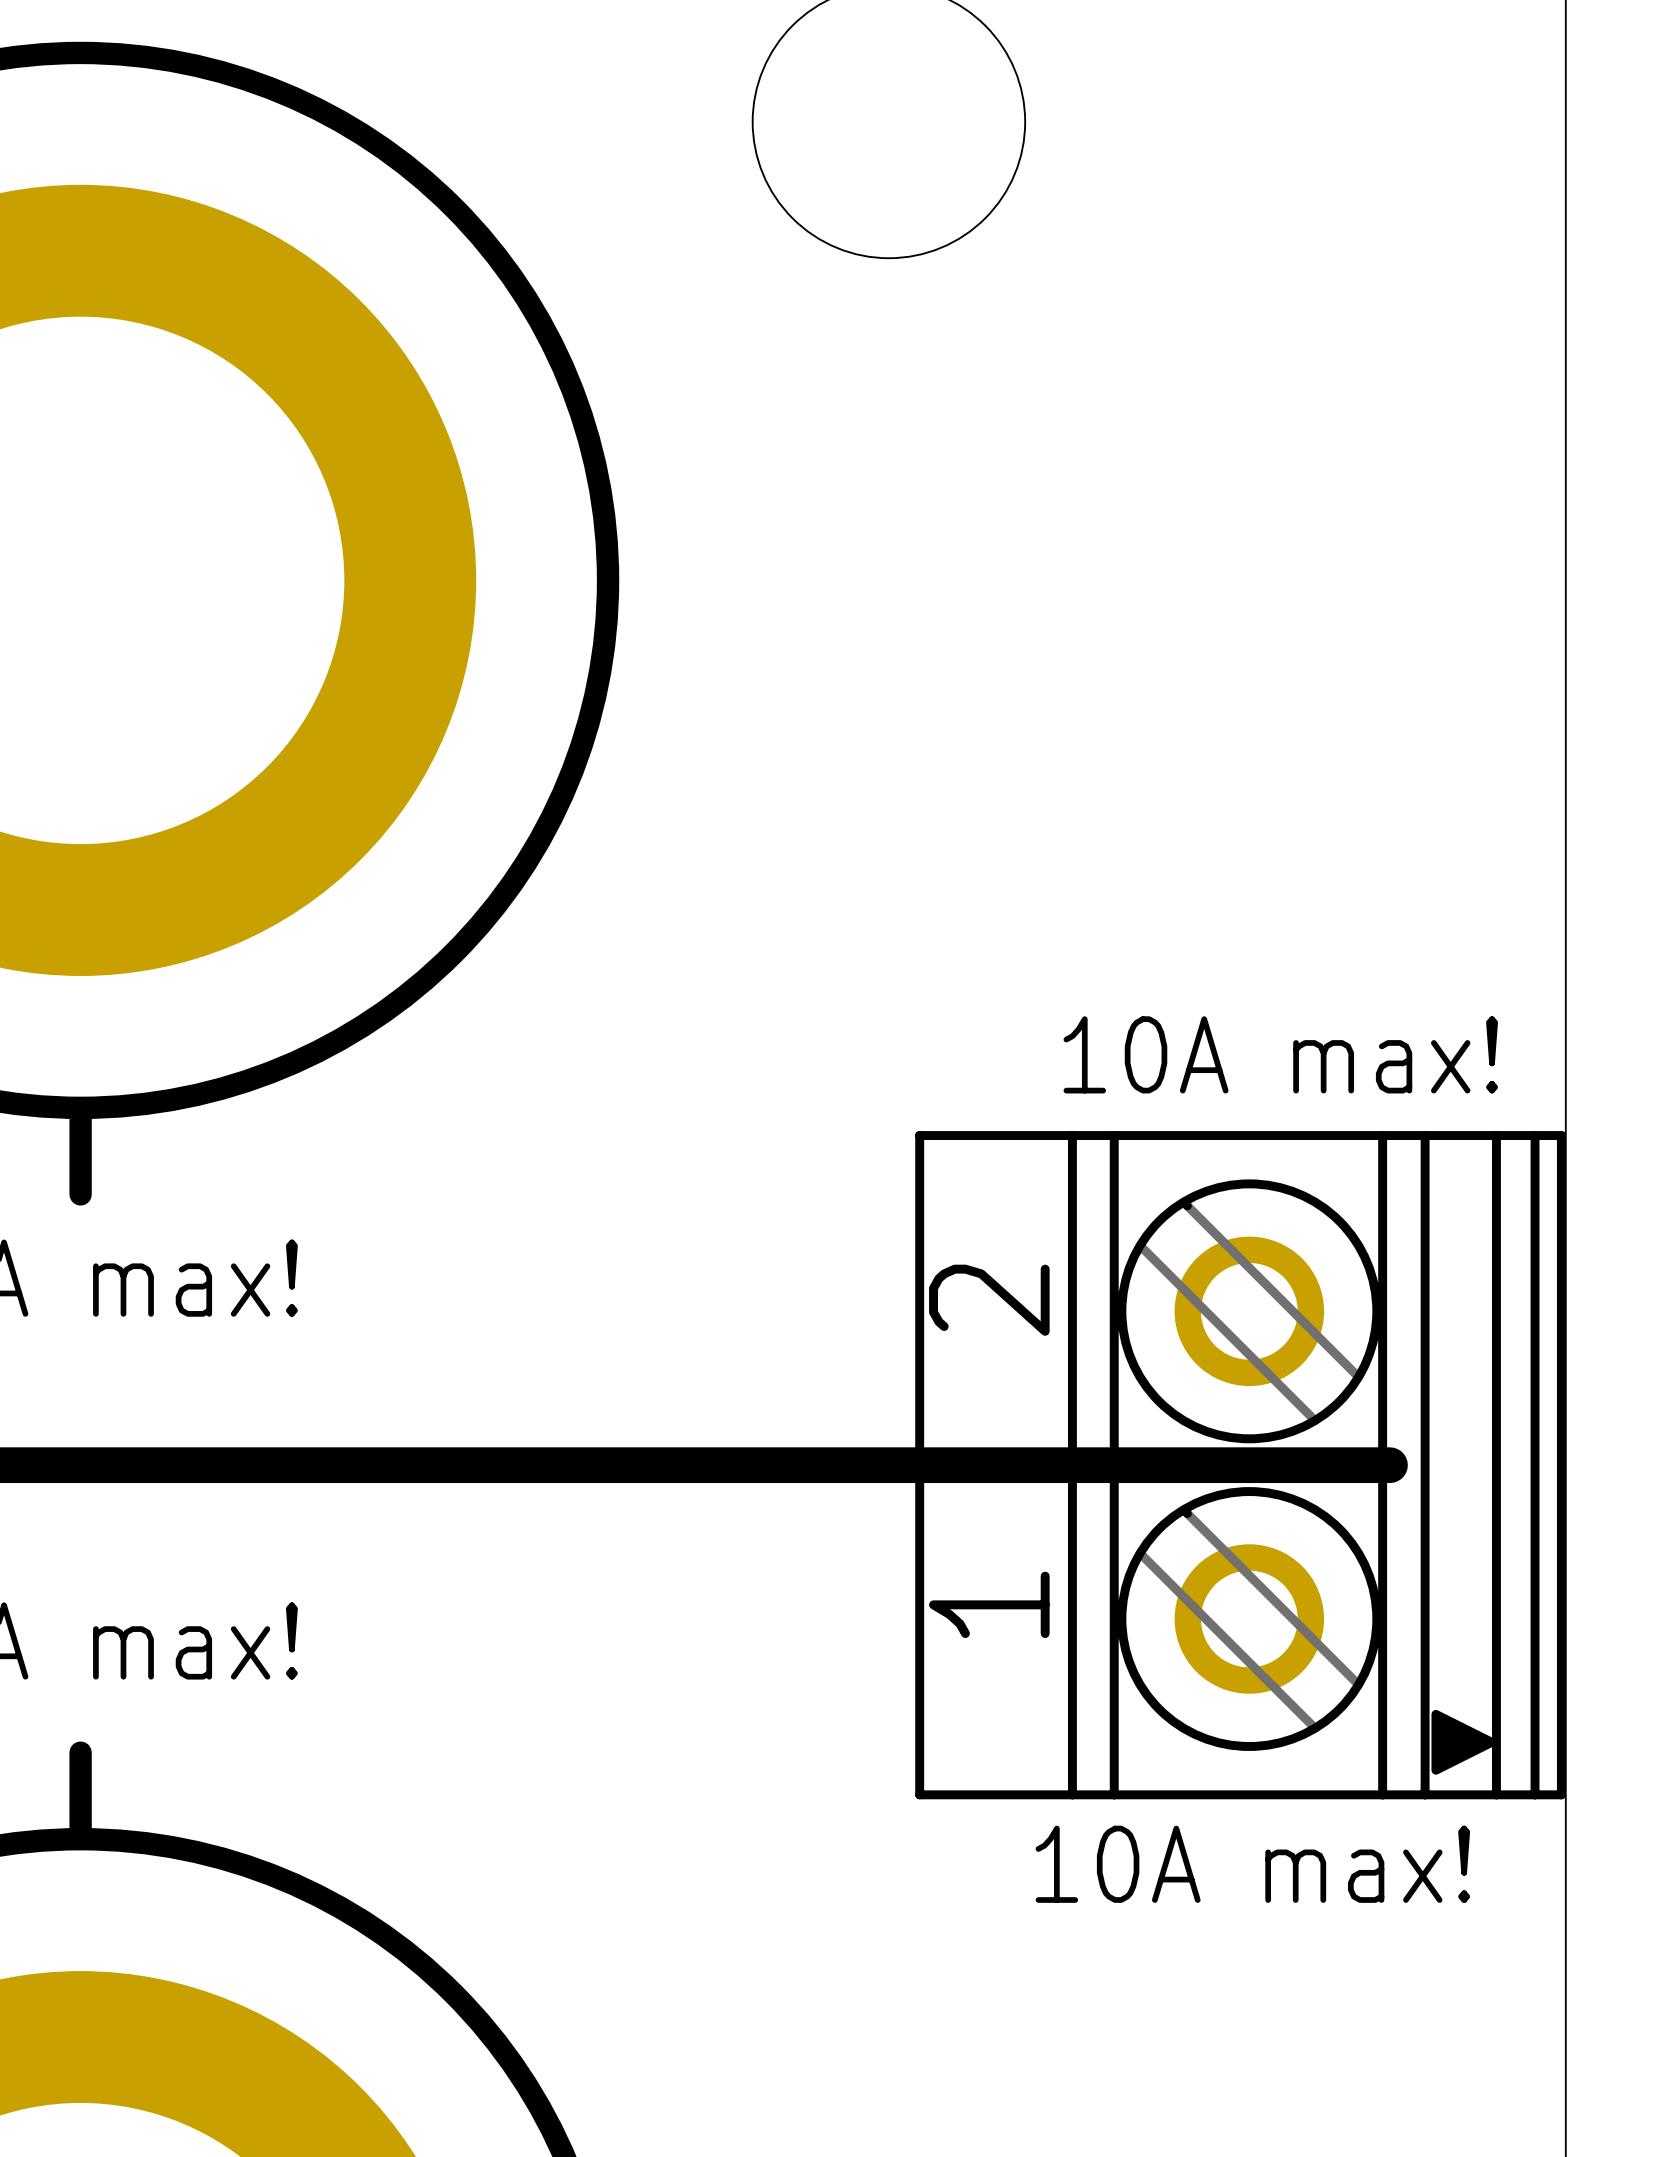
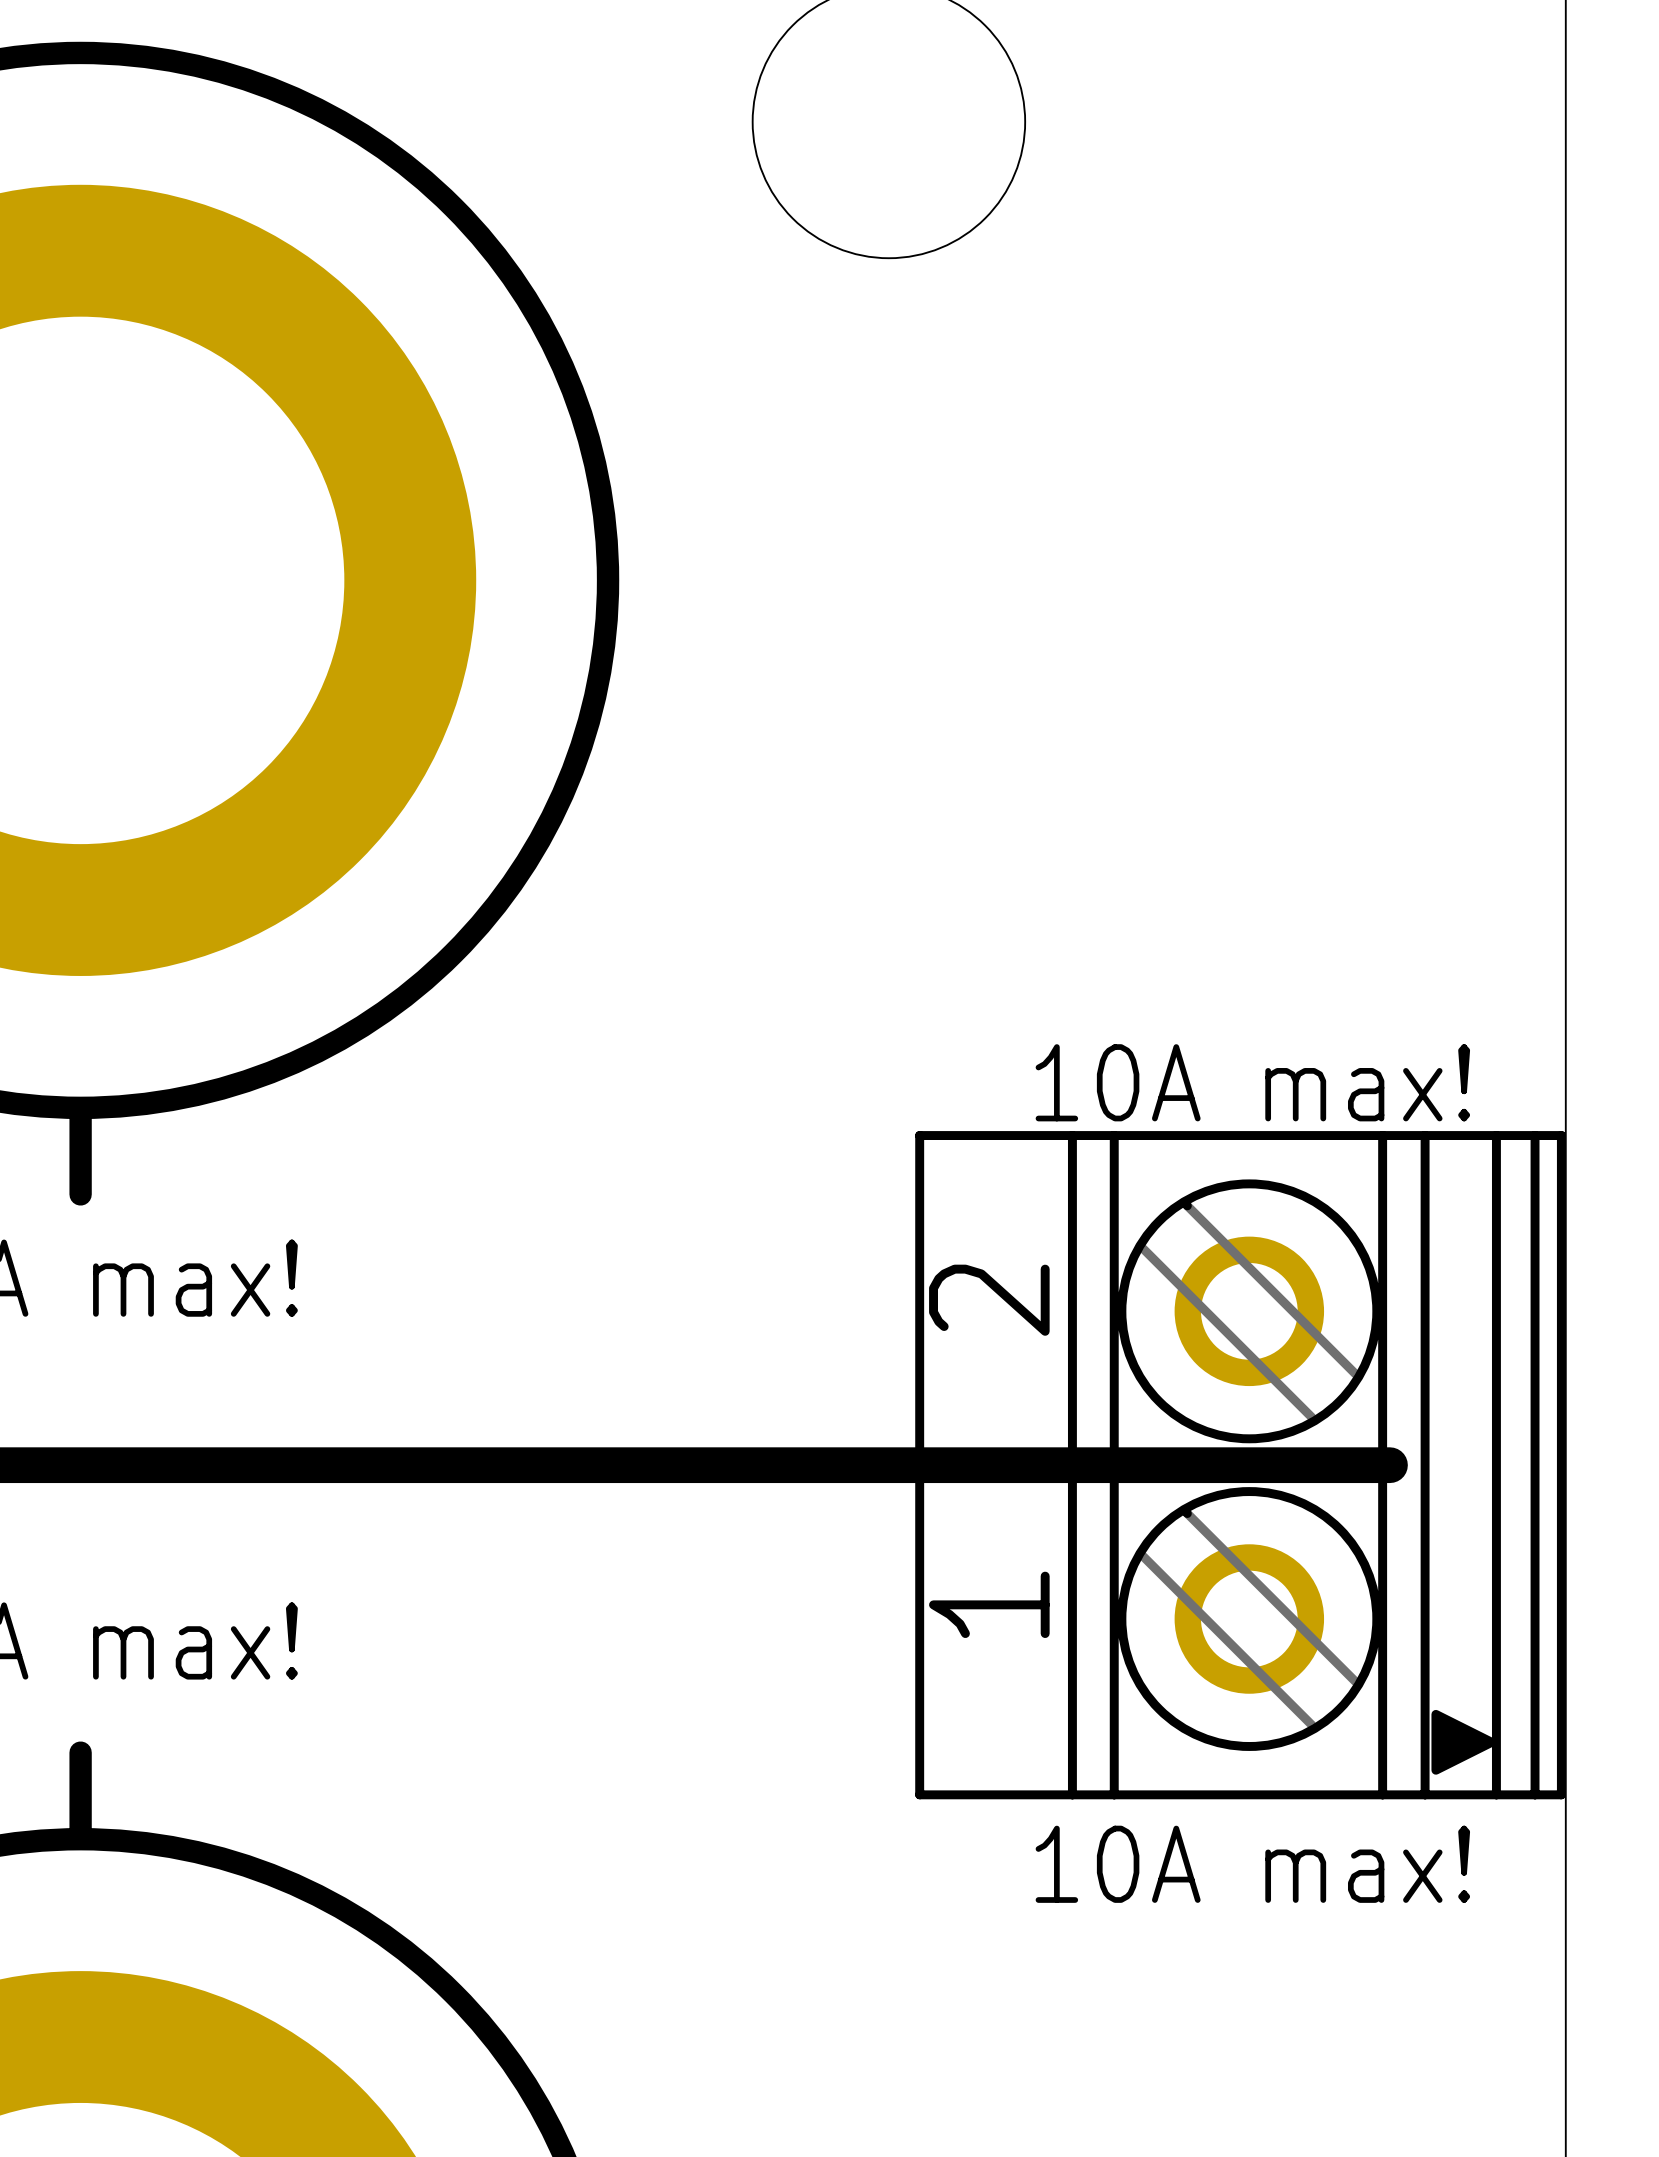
text position: 10A max! (1280, 1054) -> 10A max! (1252, 1082)

